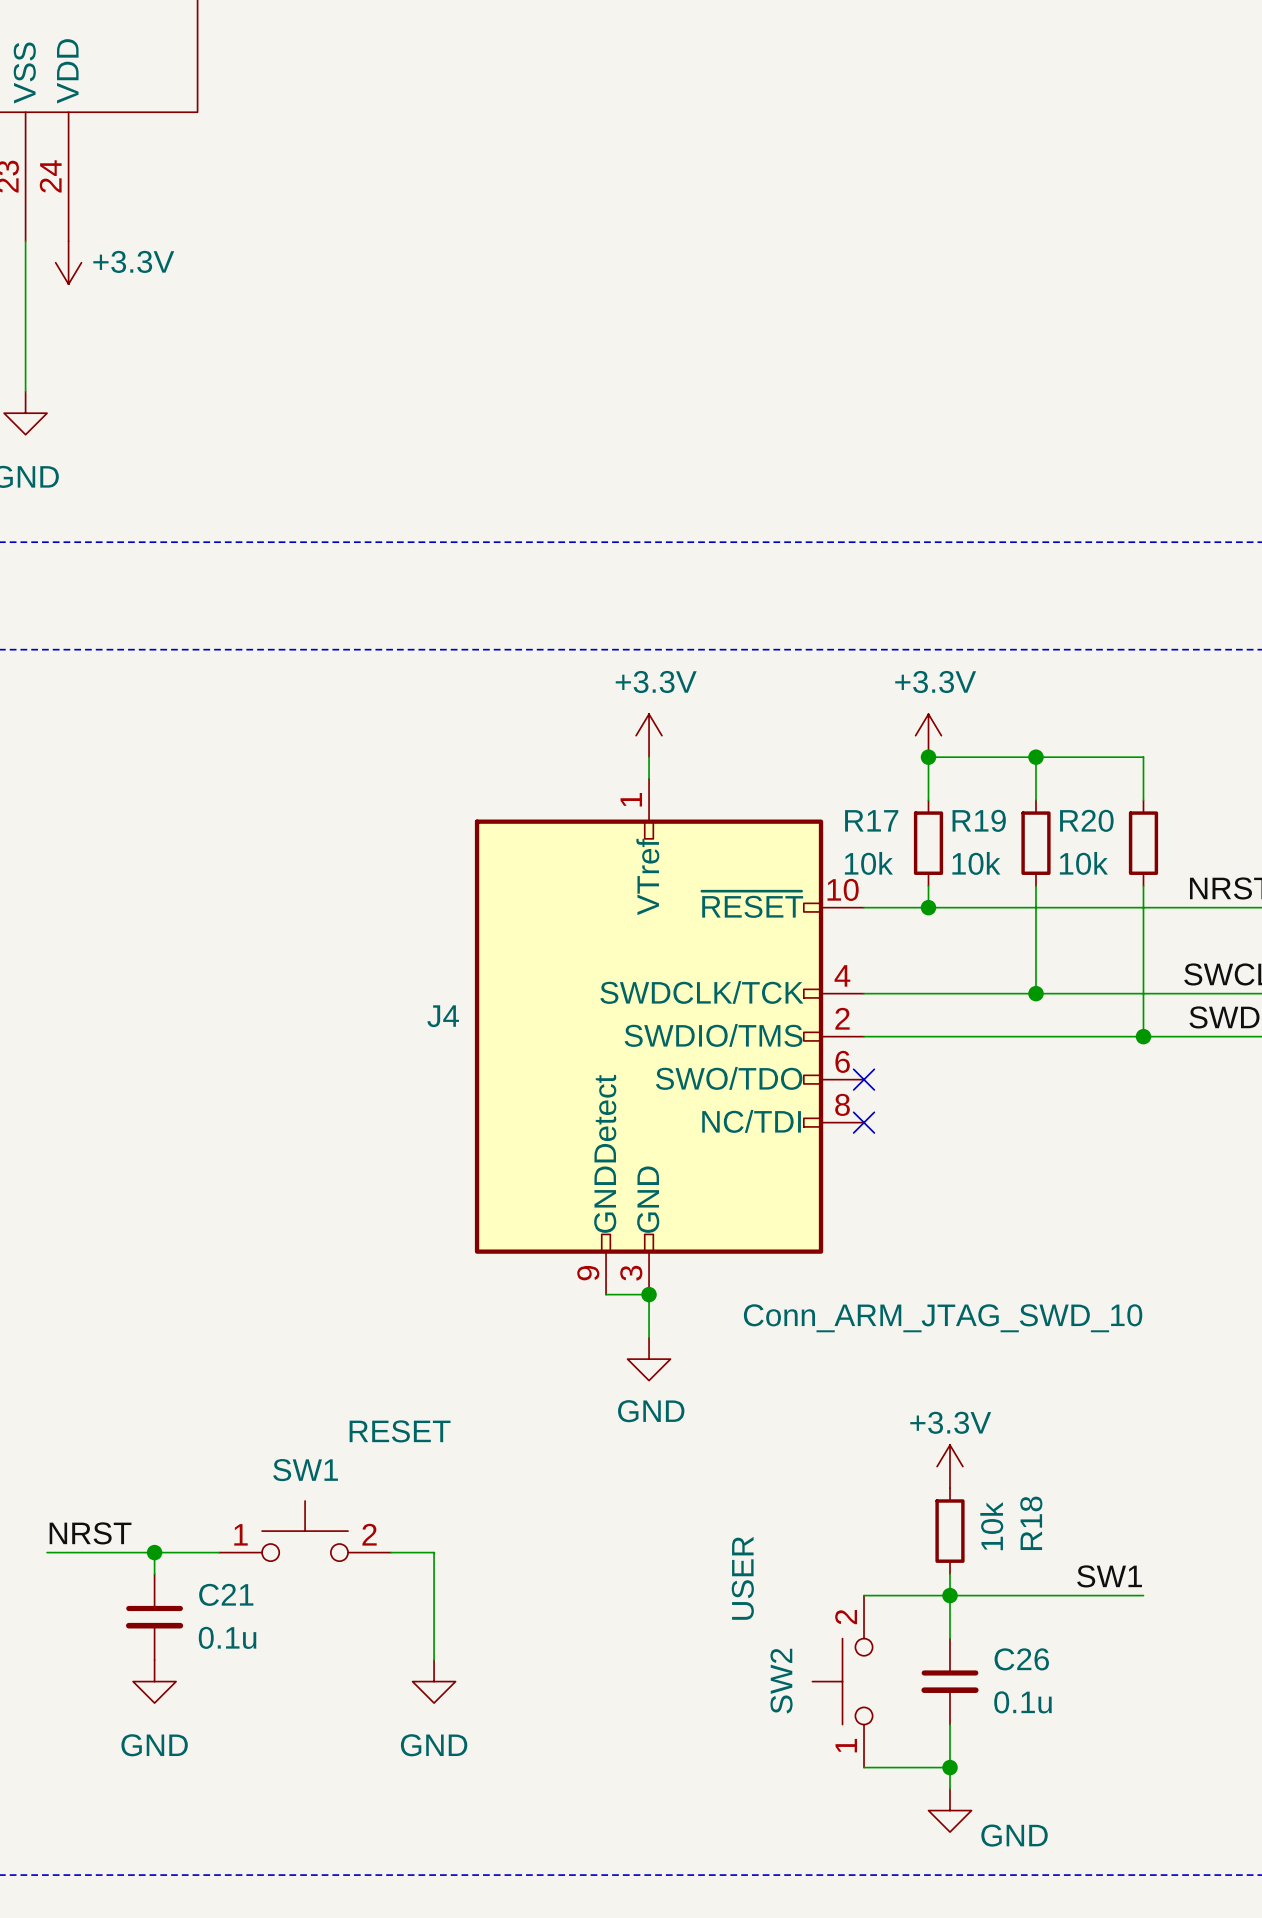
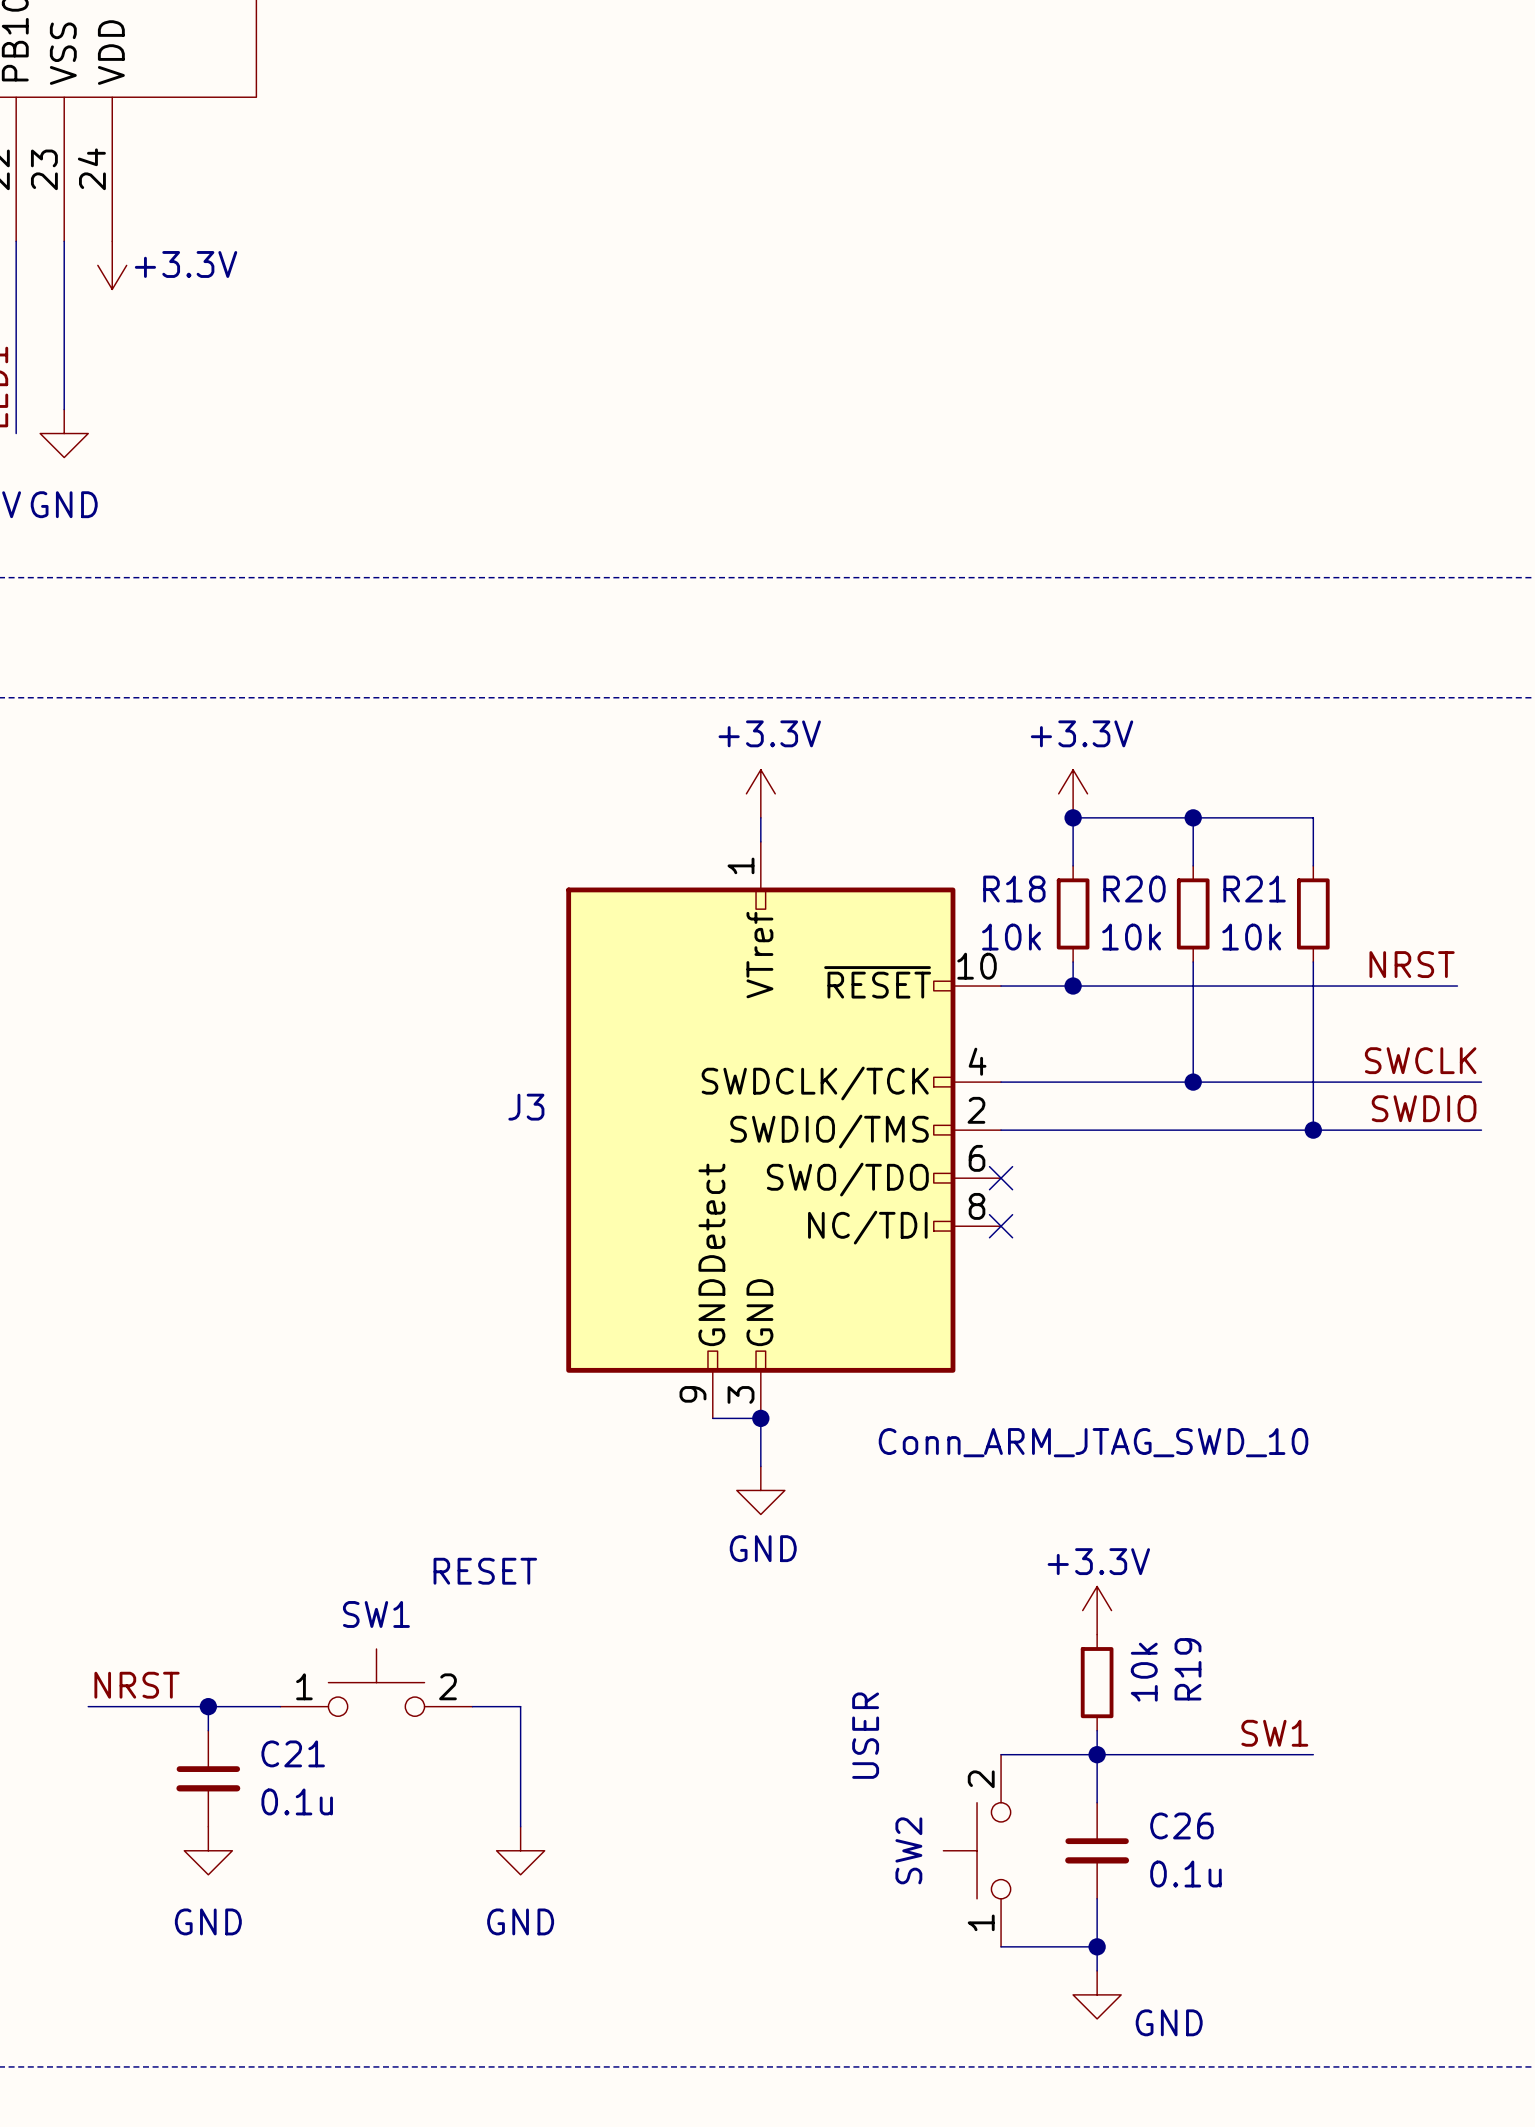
R17 name: R17 (871, 820) -> R18 (1014, 889)
R19 name: R19 (979, 820) -> R20 (1134, 889)
R20 name: R20 (1086, 820) -> R21 (1254, 889)
J4 name: J4 (443, 1016) -> J3 (526, 1107)
R18 name: R18 (1031, 1523) -> R19 (1187, 1669)

